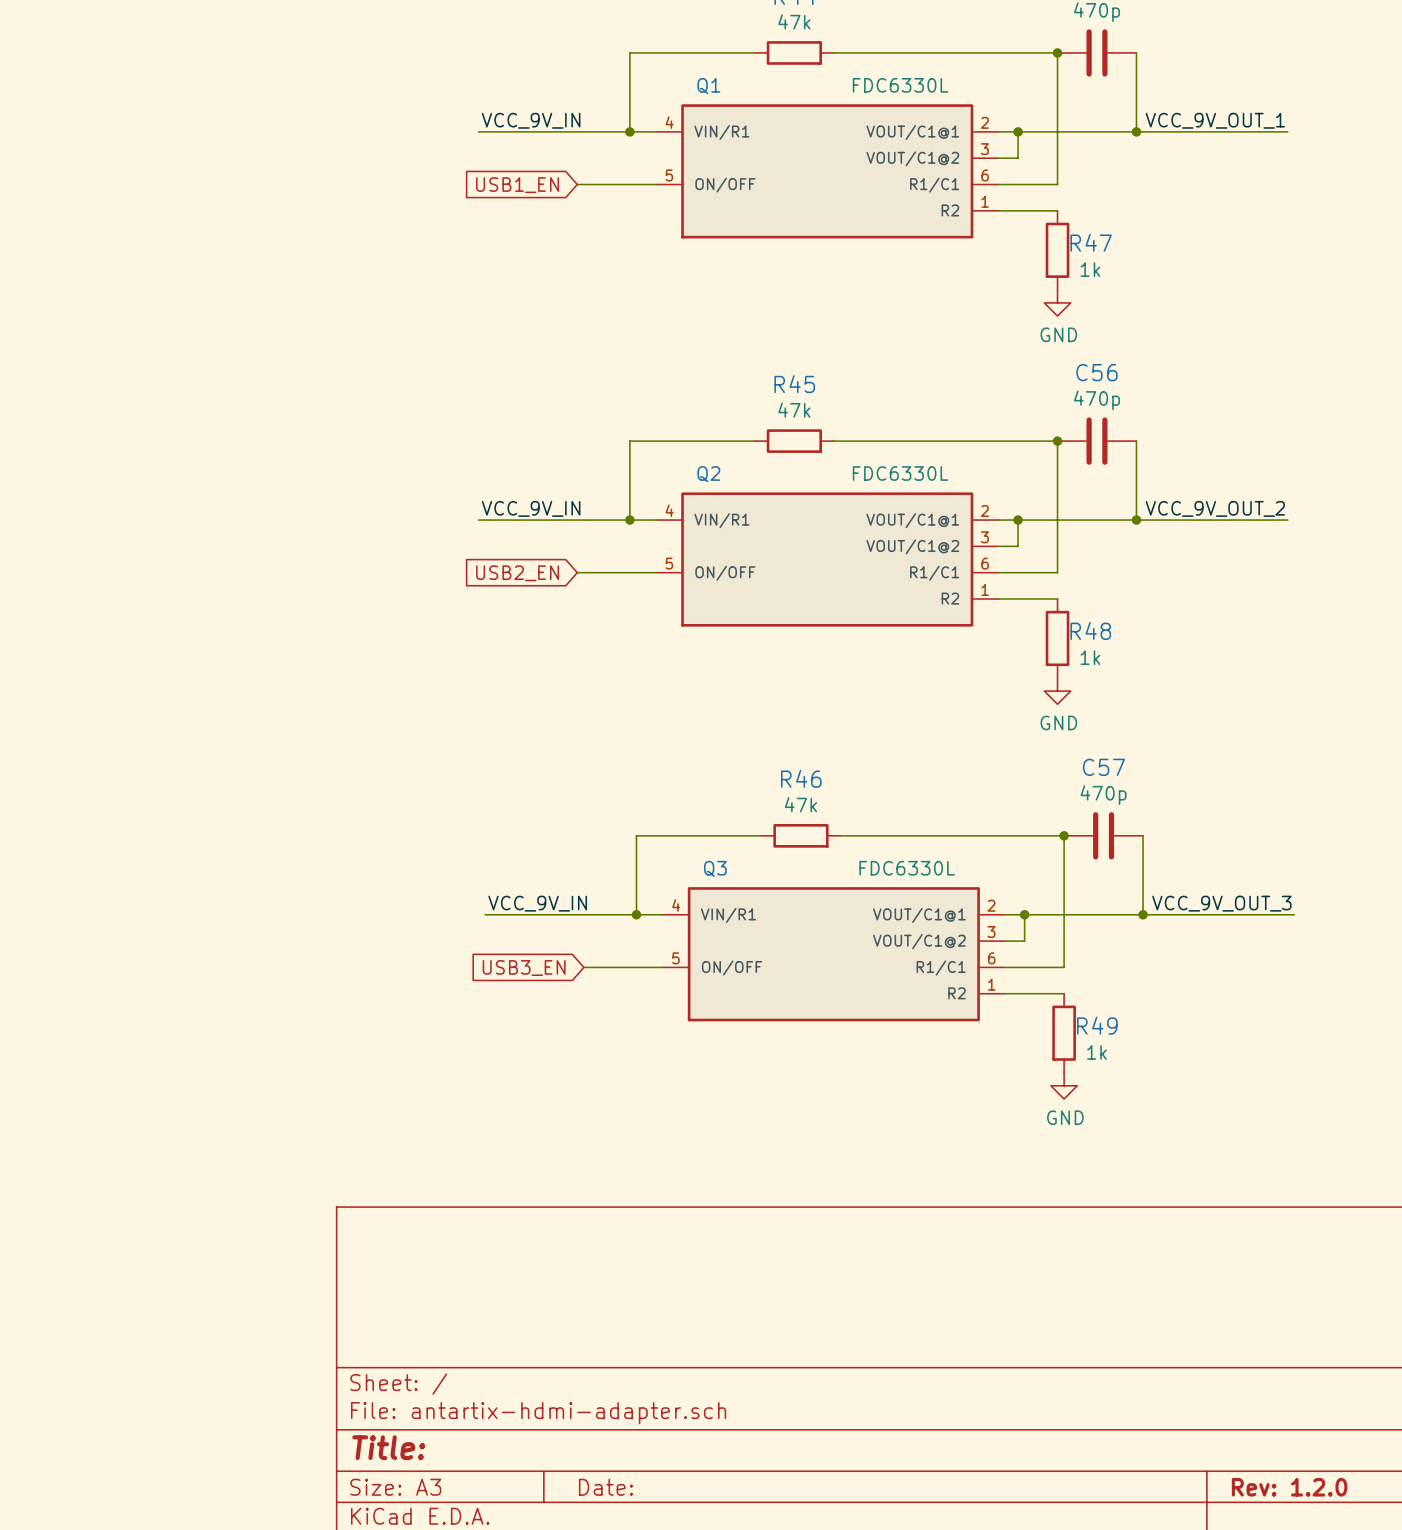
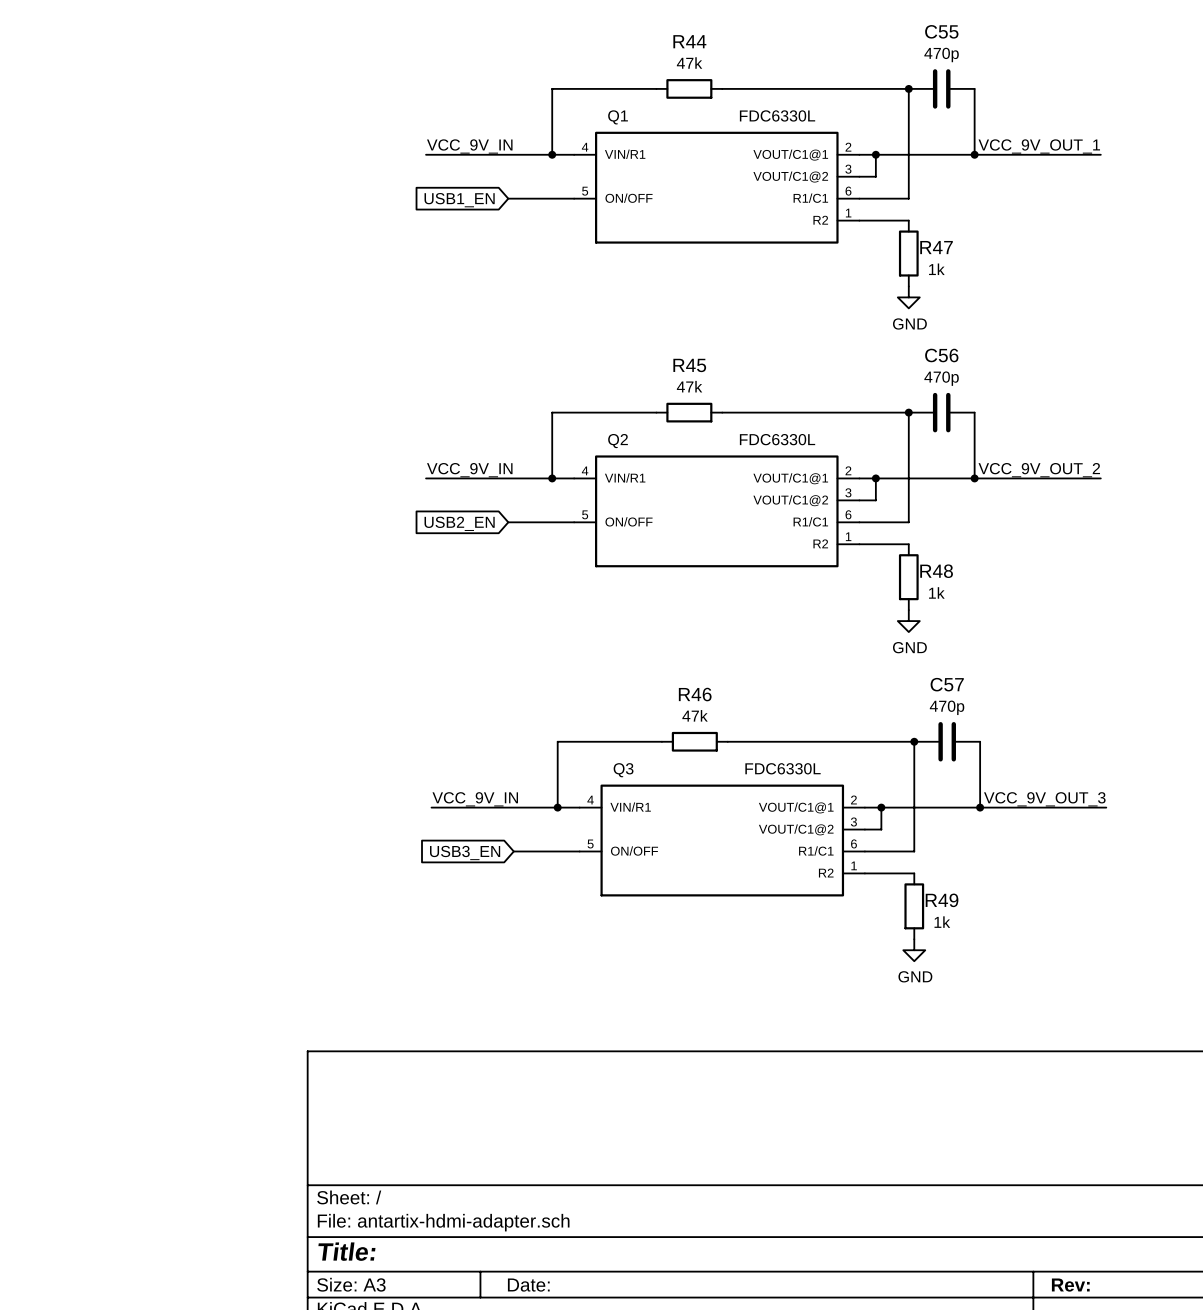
title block: Rev: 1.2.0 (1289, 1487) -> Rev: (1070, 1285)

